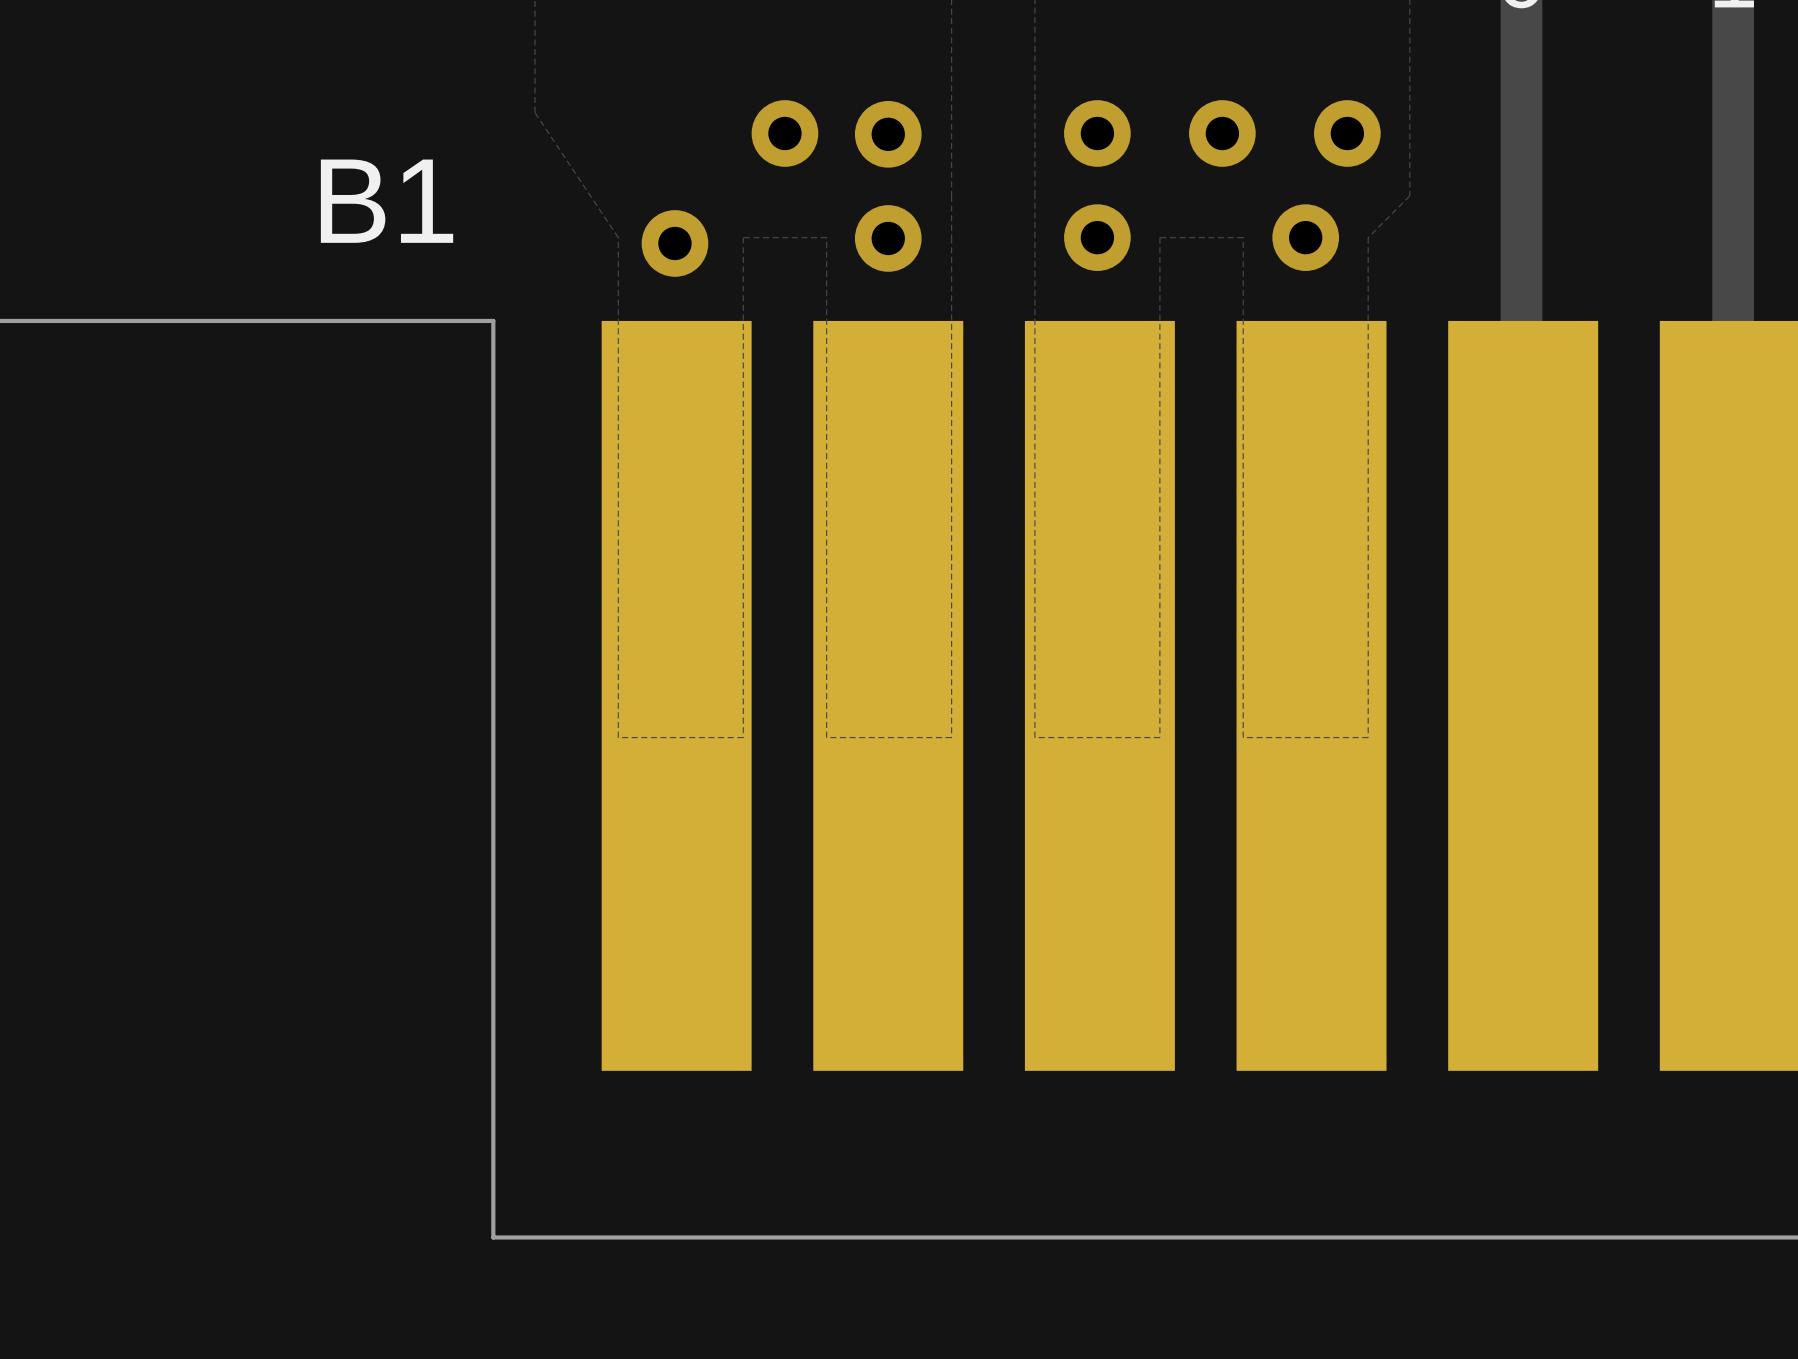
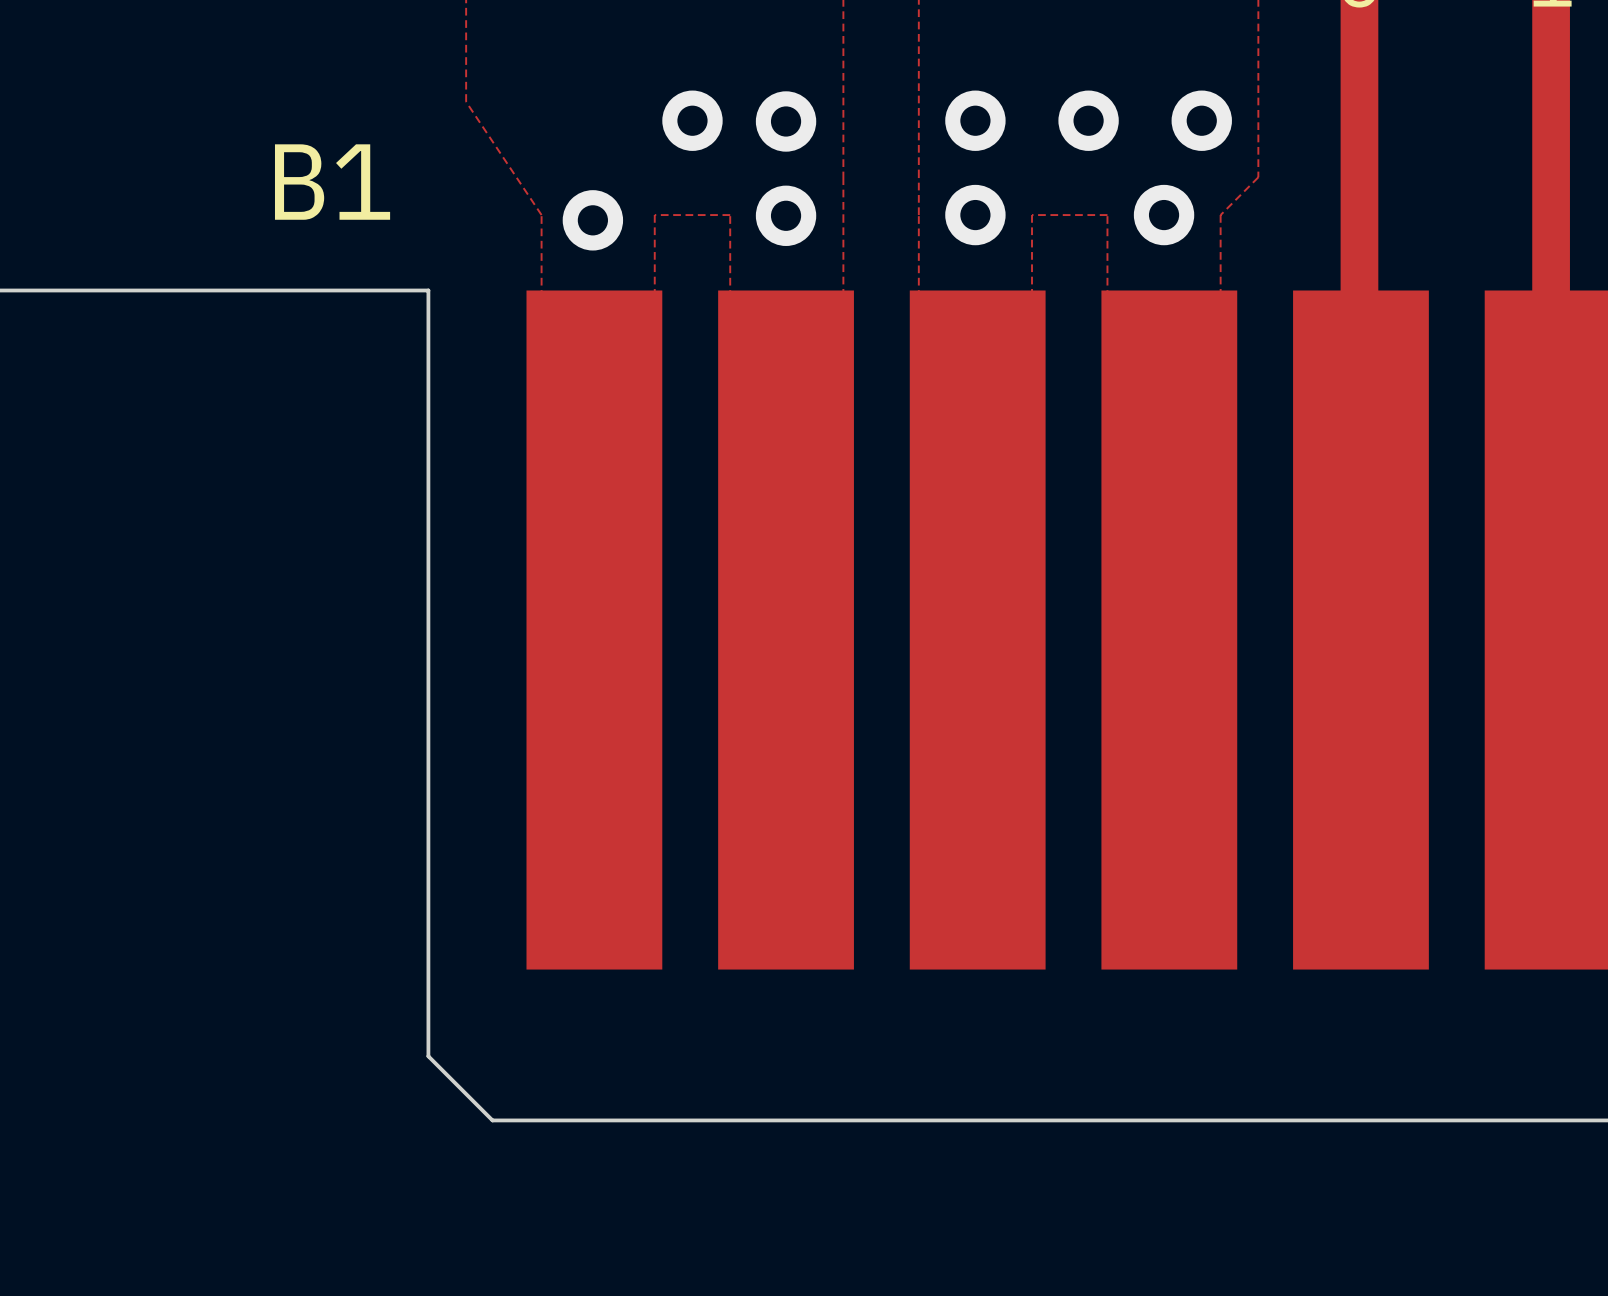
board edge: (493, 1166) (493, 1237) (564, 1237) -> (428, 1056) (492, 1120)

